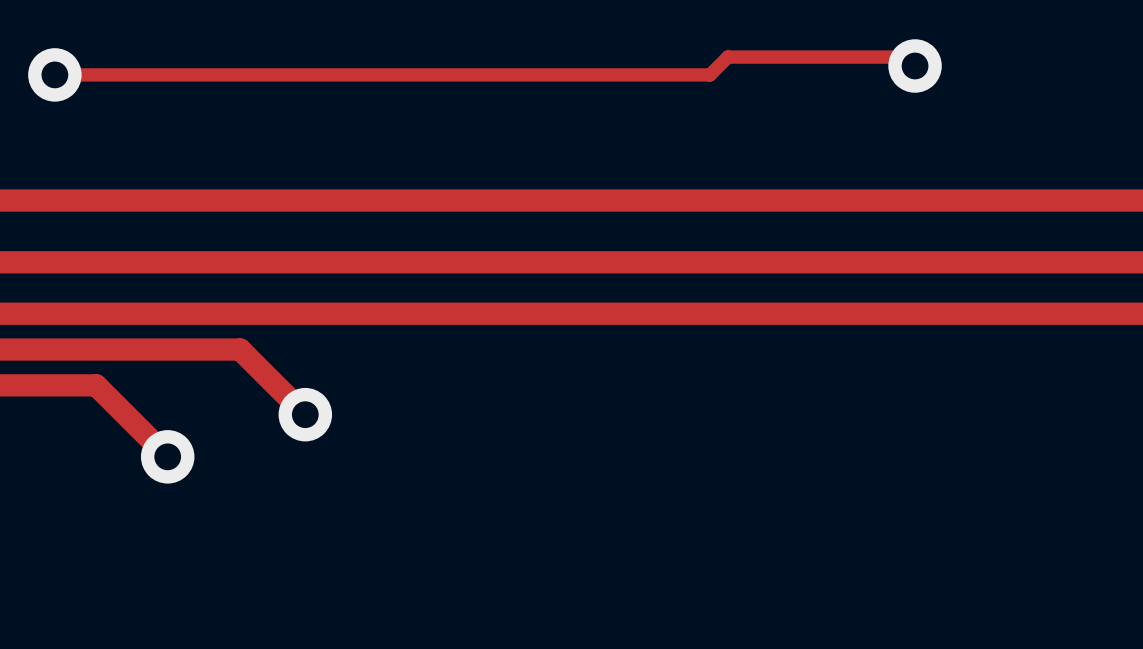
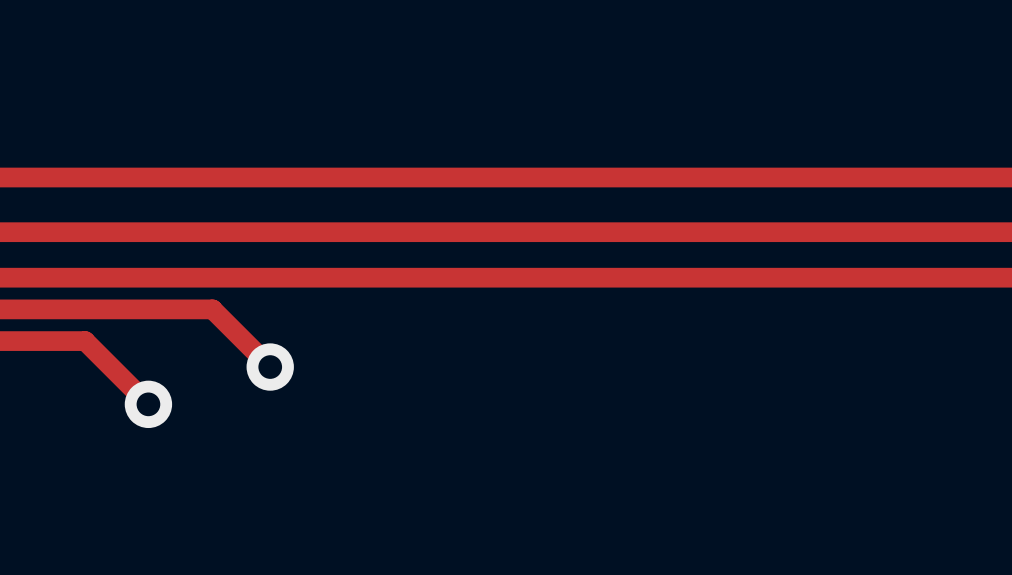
track: (915, 65) (906, 57) (727, 57) (710, 74) (54, 74) -> none
via: (915, 65) -> none
via: (54, 74) -> none

